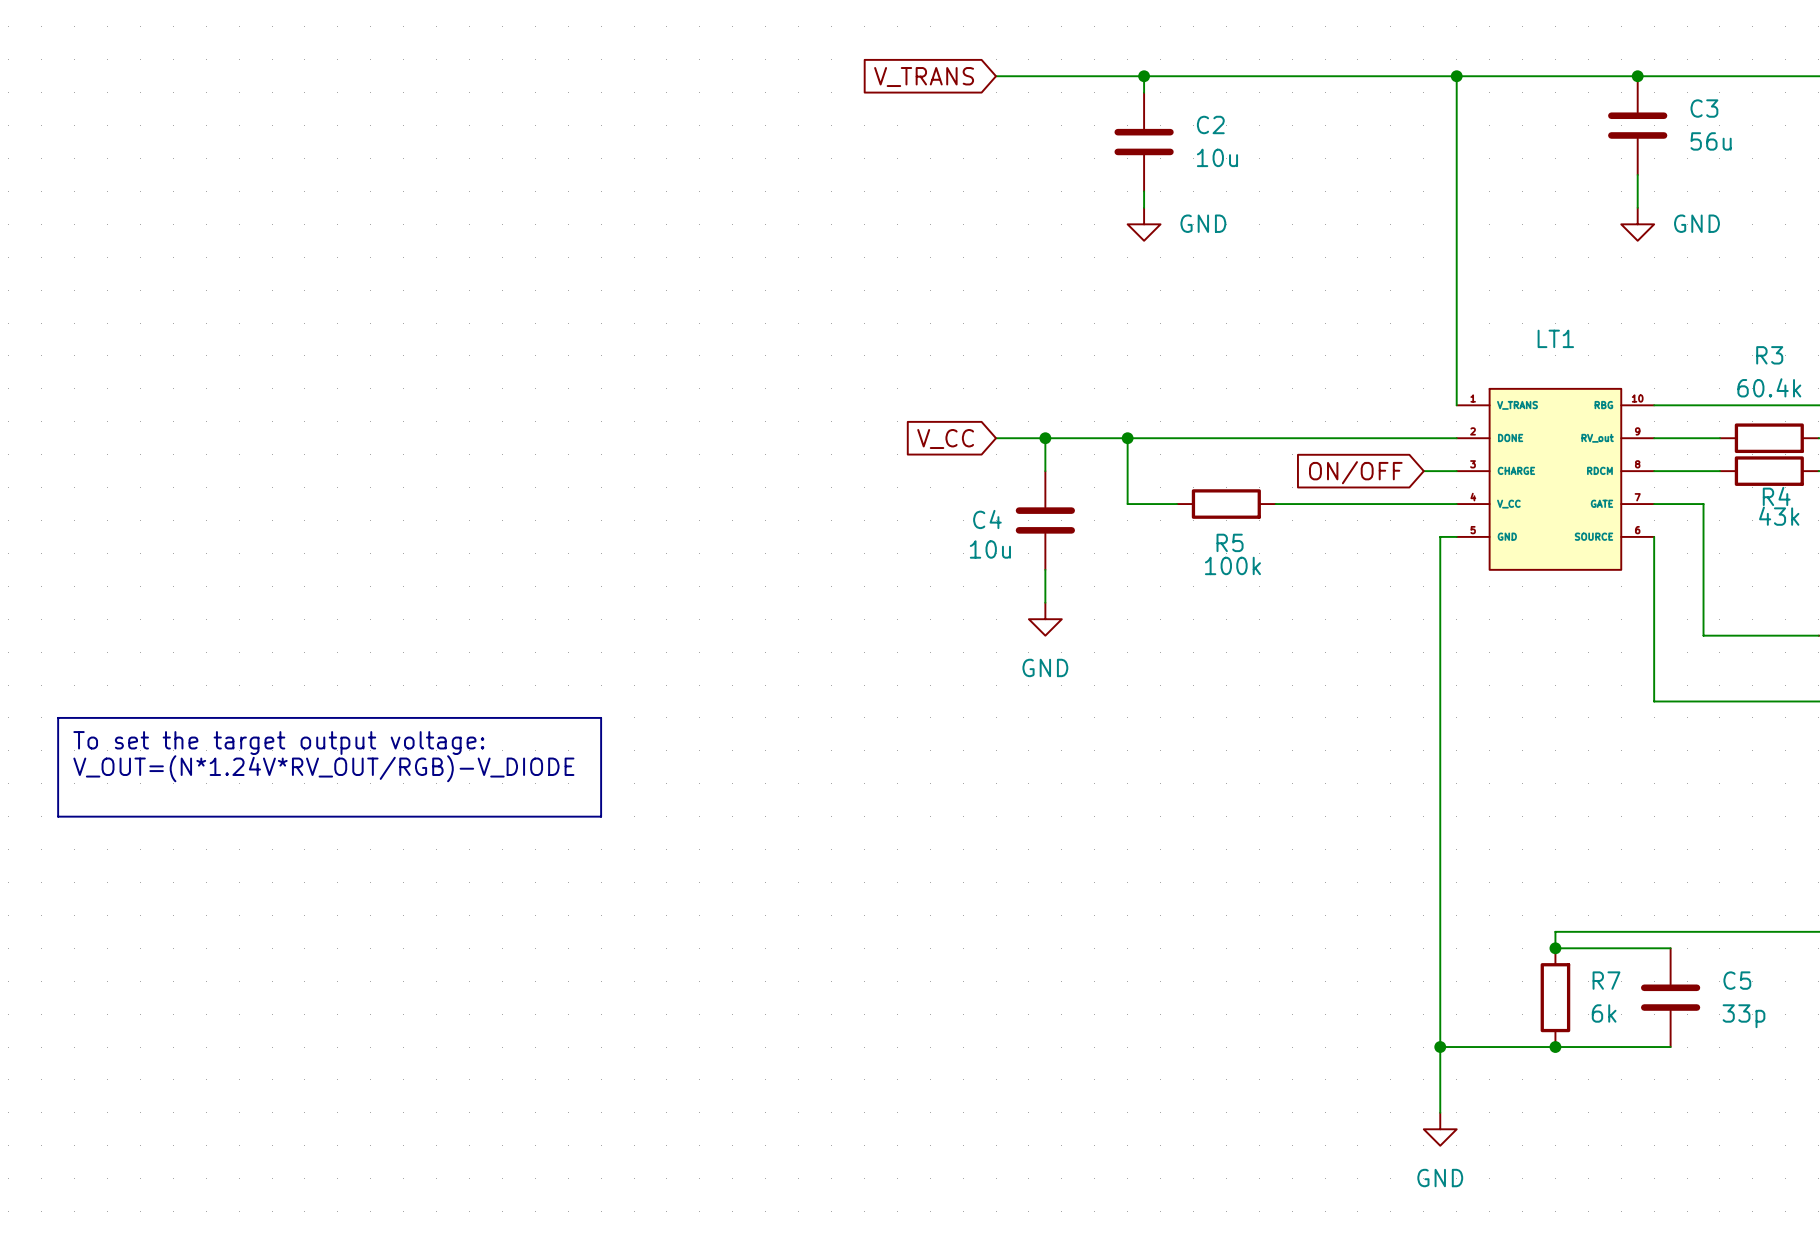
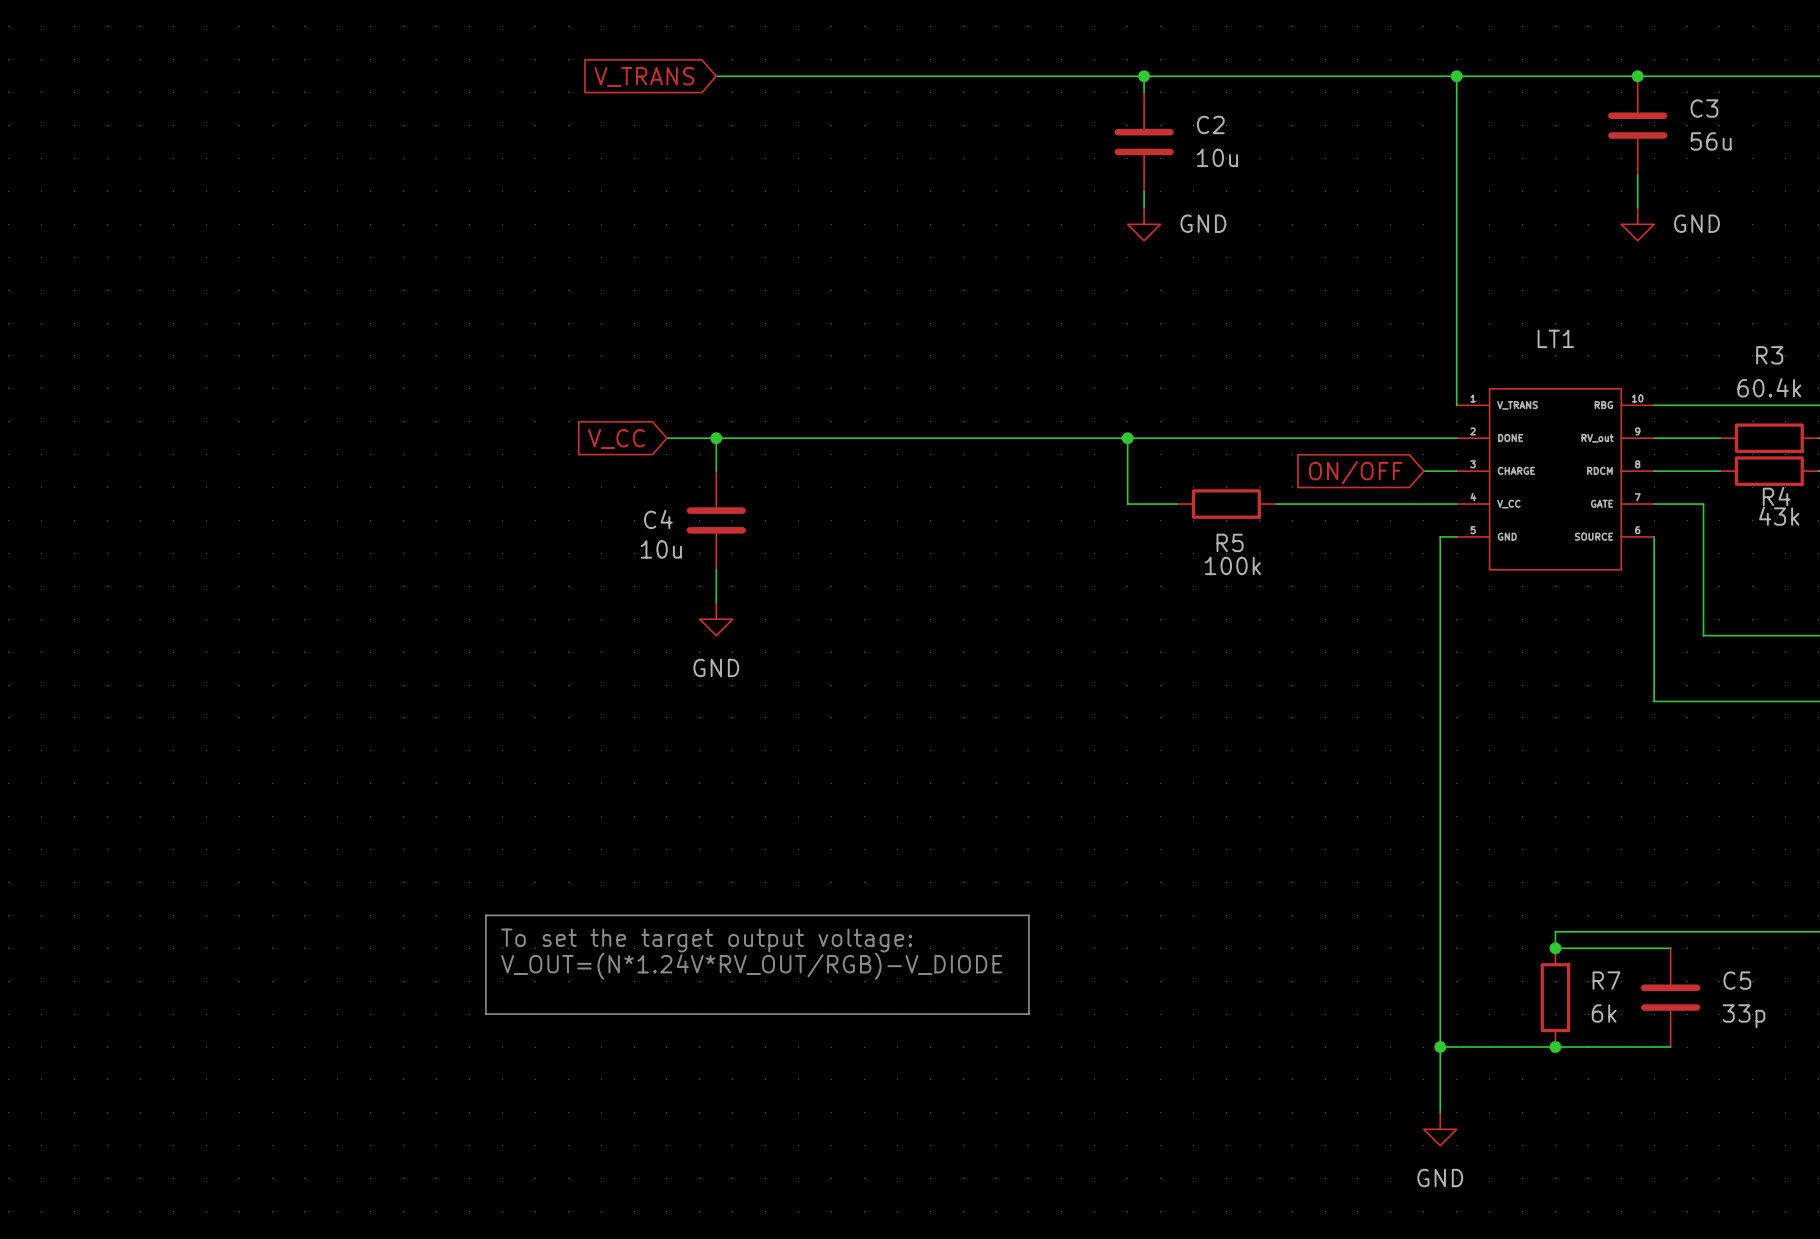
wire: none -> (716, 76) (996, 76)
global label position: V_TRANS (924, 77) -> V_TRANS (644, 77)
wire: none -> (666, 438) (996, 438)
wire: none -> (716, 438) (716, 471)
junction: none -> (716, 438)
wire: (1045, 438) (1045, 471) -> none
junction: (1045, 438) -> none
global label: none -> V_CC (616, 439)
global label: V_CC (945, 439) -> none
C4 position: (1045, 520) -> (716, 520)
wire: none -> (716, 569) (716, 602)
wire: (1045, 569) (1045, 602) -> none
power symbol: none -> GND (716, 619)
power symbol: GND (1045, 619) -> none
line: (58, 717) (601, 717) (601, 816) (58, 816) (58, 717) -> none
text: To set the target output voltage: (278, 743) -> none
text: V_OUT=(N*1.24V*RV_OUT/RGB)-V_DIODE (323, 768) -> none
line: none -> (485, 915) (1028, 915) (1028, 1014) (485, 1014) (485, 915)
text: none -> To set the target output voltage: (706, 940)
text: none -> V_OUT=(N*1.24V*RV_OUT/RGB)-V_DIODE (751, 966)

